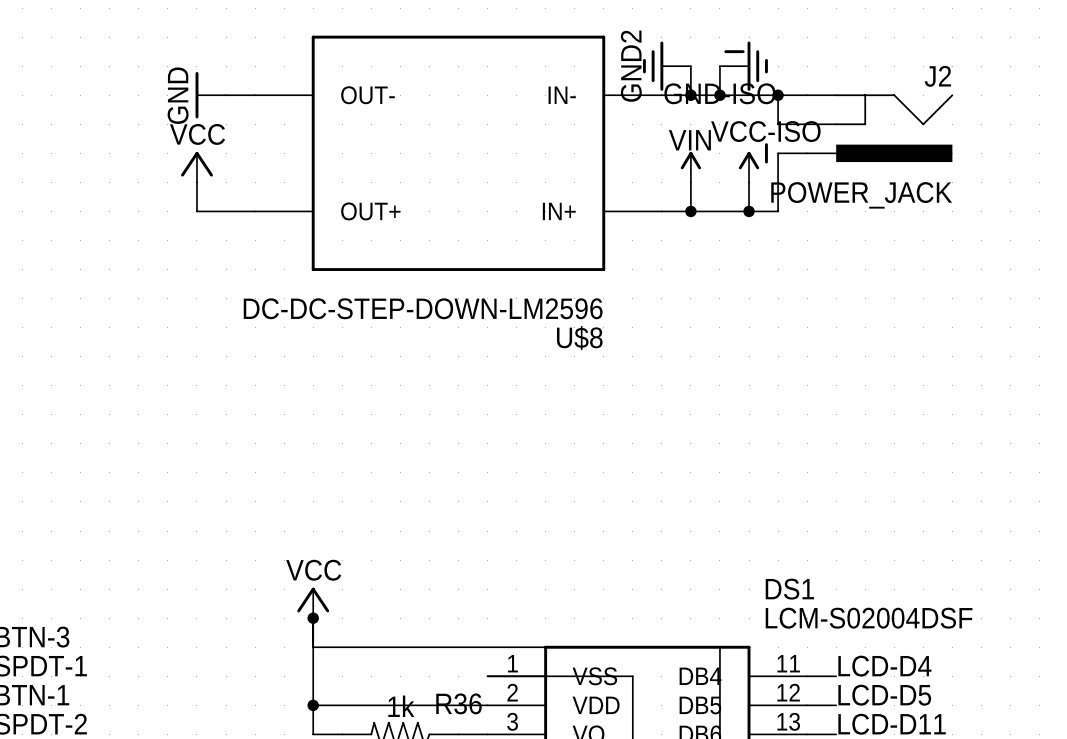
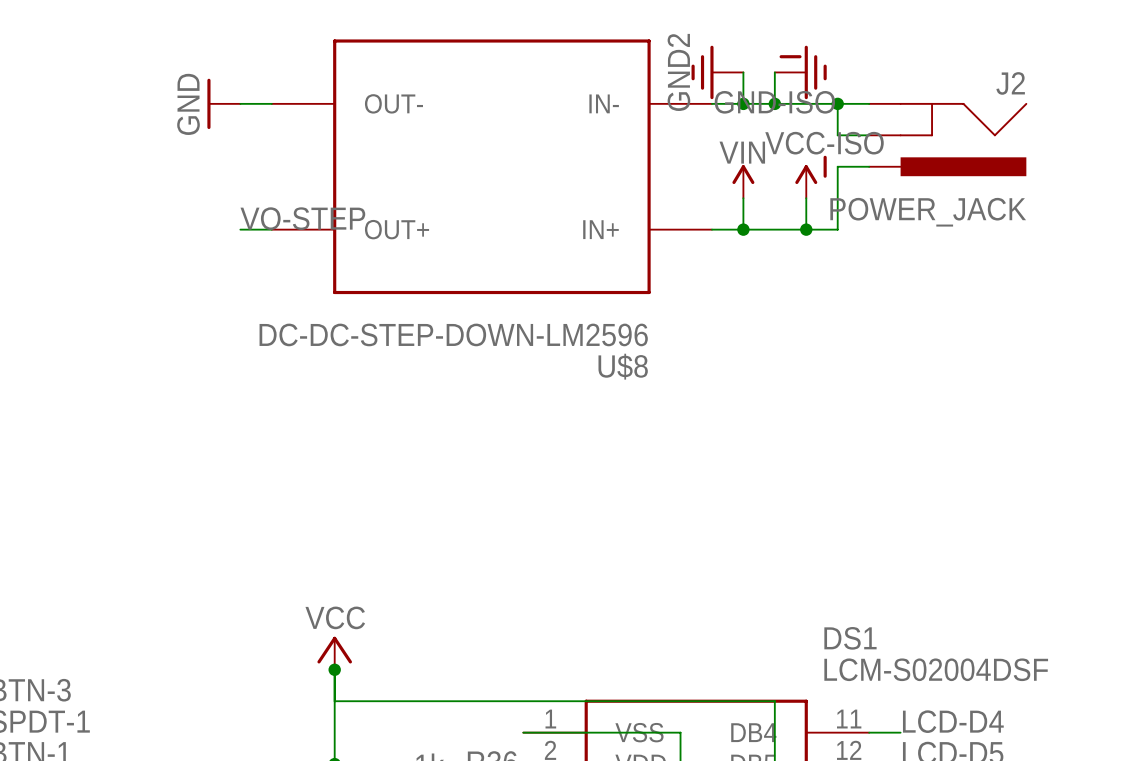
power symbol: VCC (196, 167) -> none
wire: (196, 182) (196, 211) (226, 211) -> none
label: none -> VO-STEP (302, 218)

